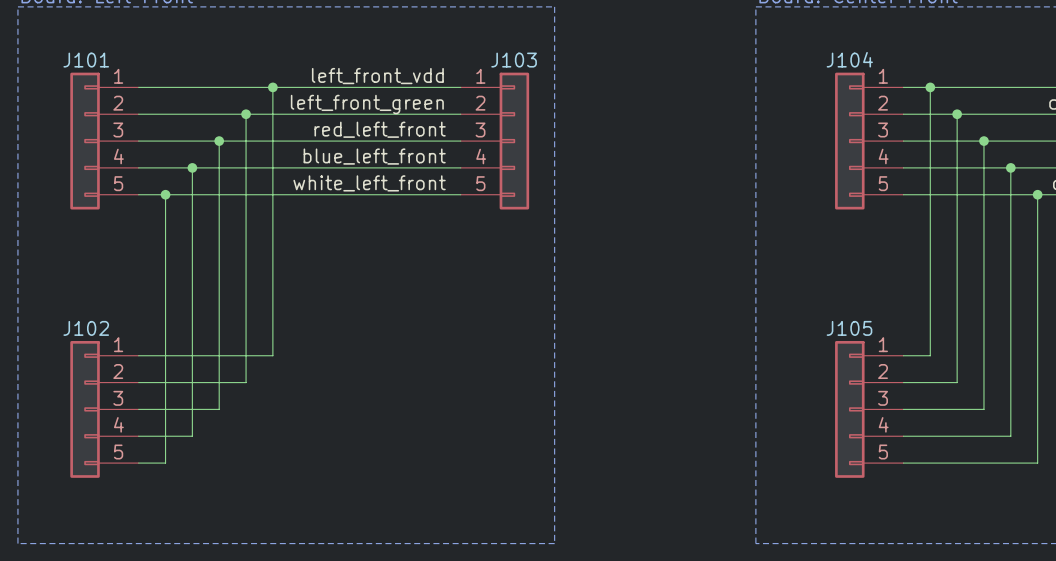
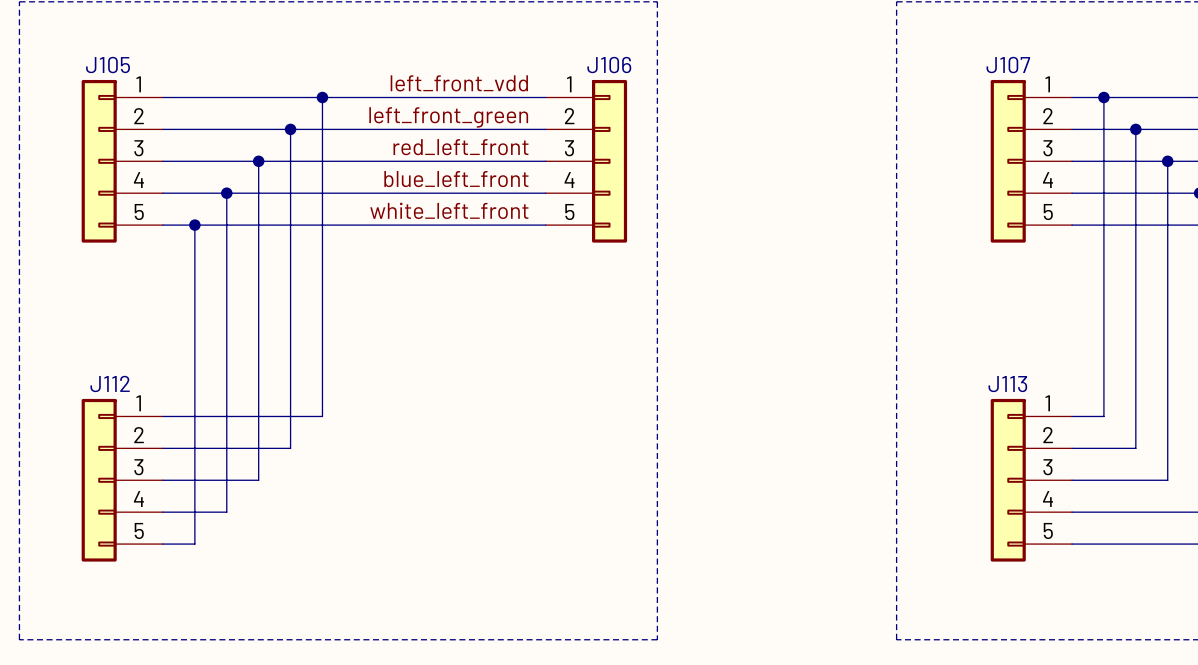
J104 name: J104 (849, 59) -> J107 (1008, 65)
J101 name: J101 (86, 60) -> J105 (107, 65)
J103 name: J103 (514, 60) -> J106 (609, 65)
J102 name: J102 (86, 328) -> J112 (110, 383)
J105 name: J105 (849, 328) -> J113 (1007, 384)

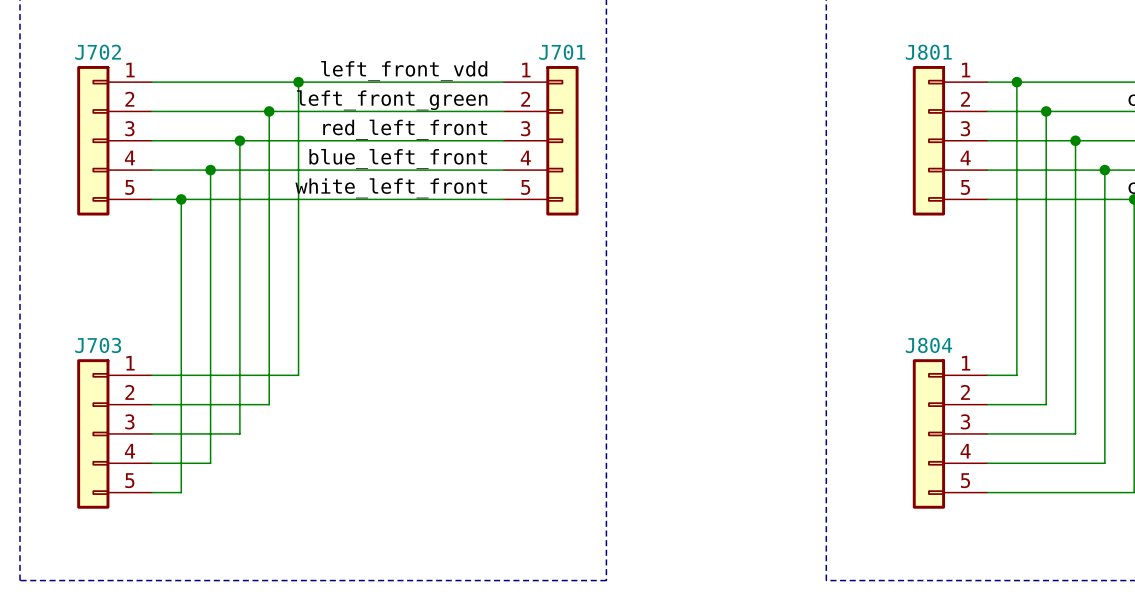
J105 name: J105 (107, 65) -> J702 (98, 52)
J106 name: J106 (609, 65) -> J701 (562, 52)
J107 name: J107 (1008, 65) -> J801 (928, 52)
J112 name: J112 (110, 383) -> J703 (98, 345)
J113 name: J113 (1007, 384) -> J804 (928, 345)

